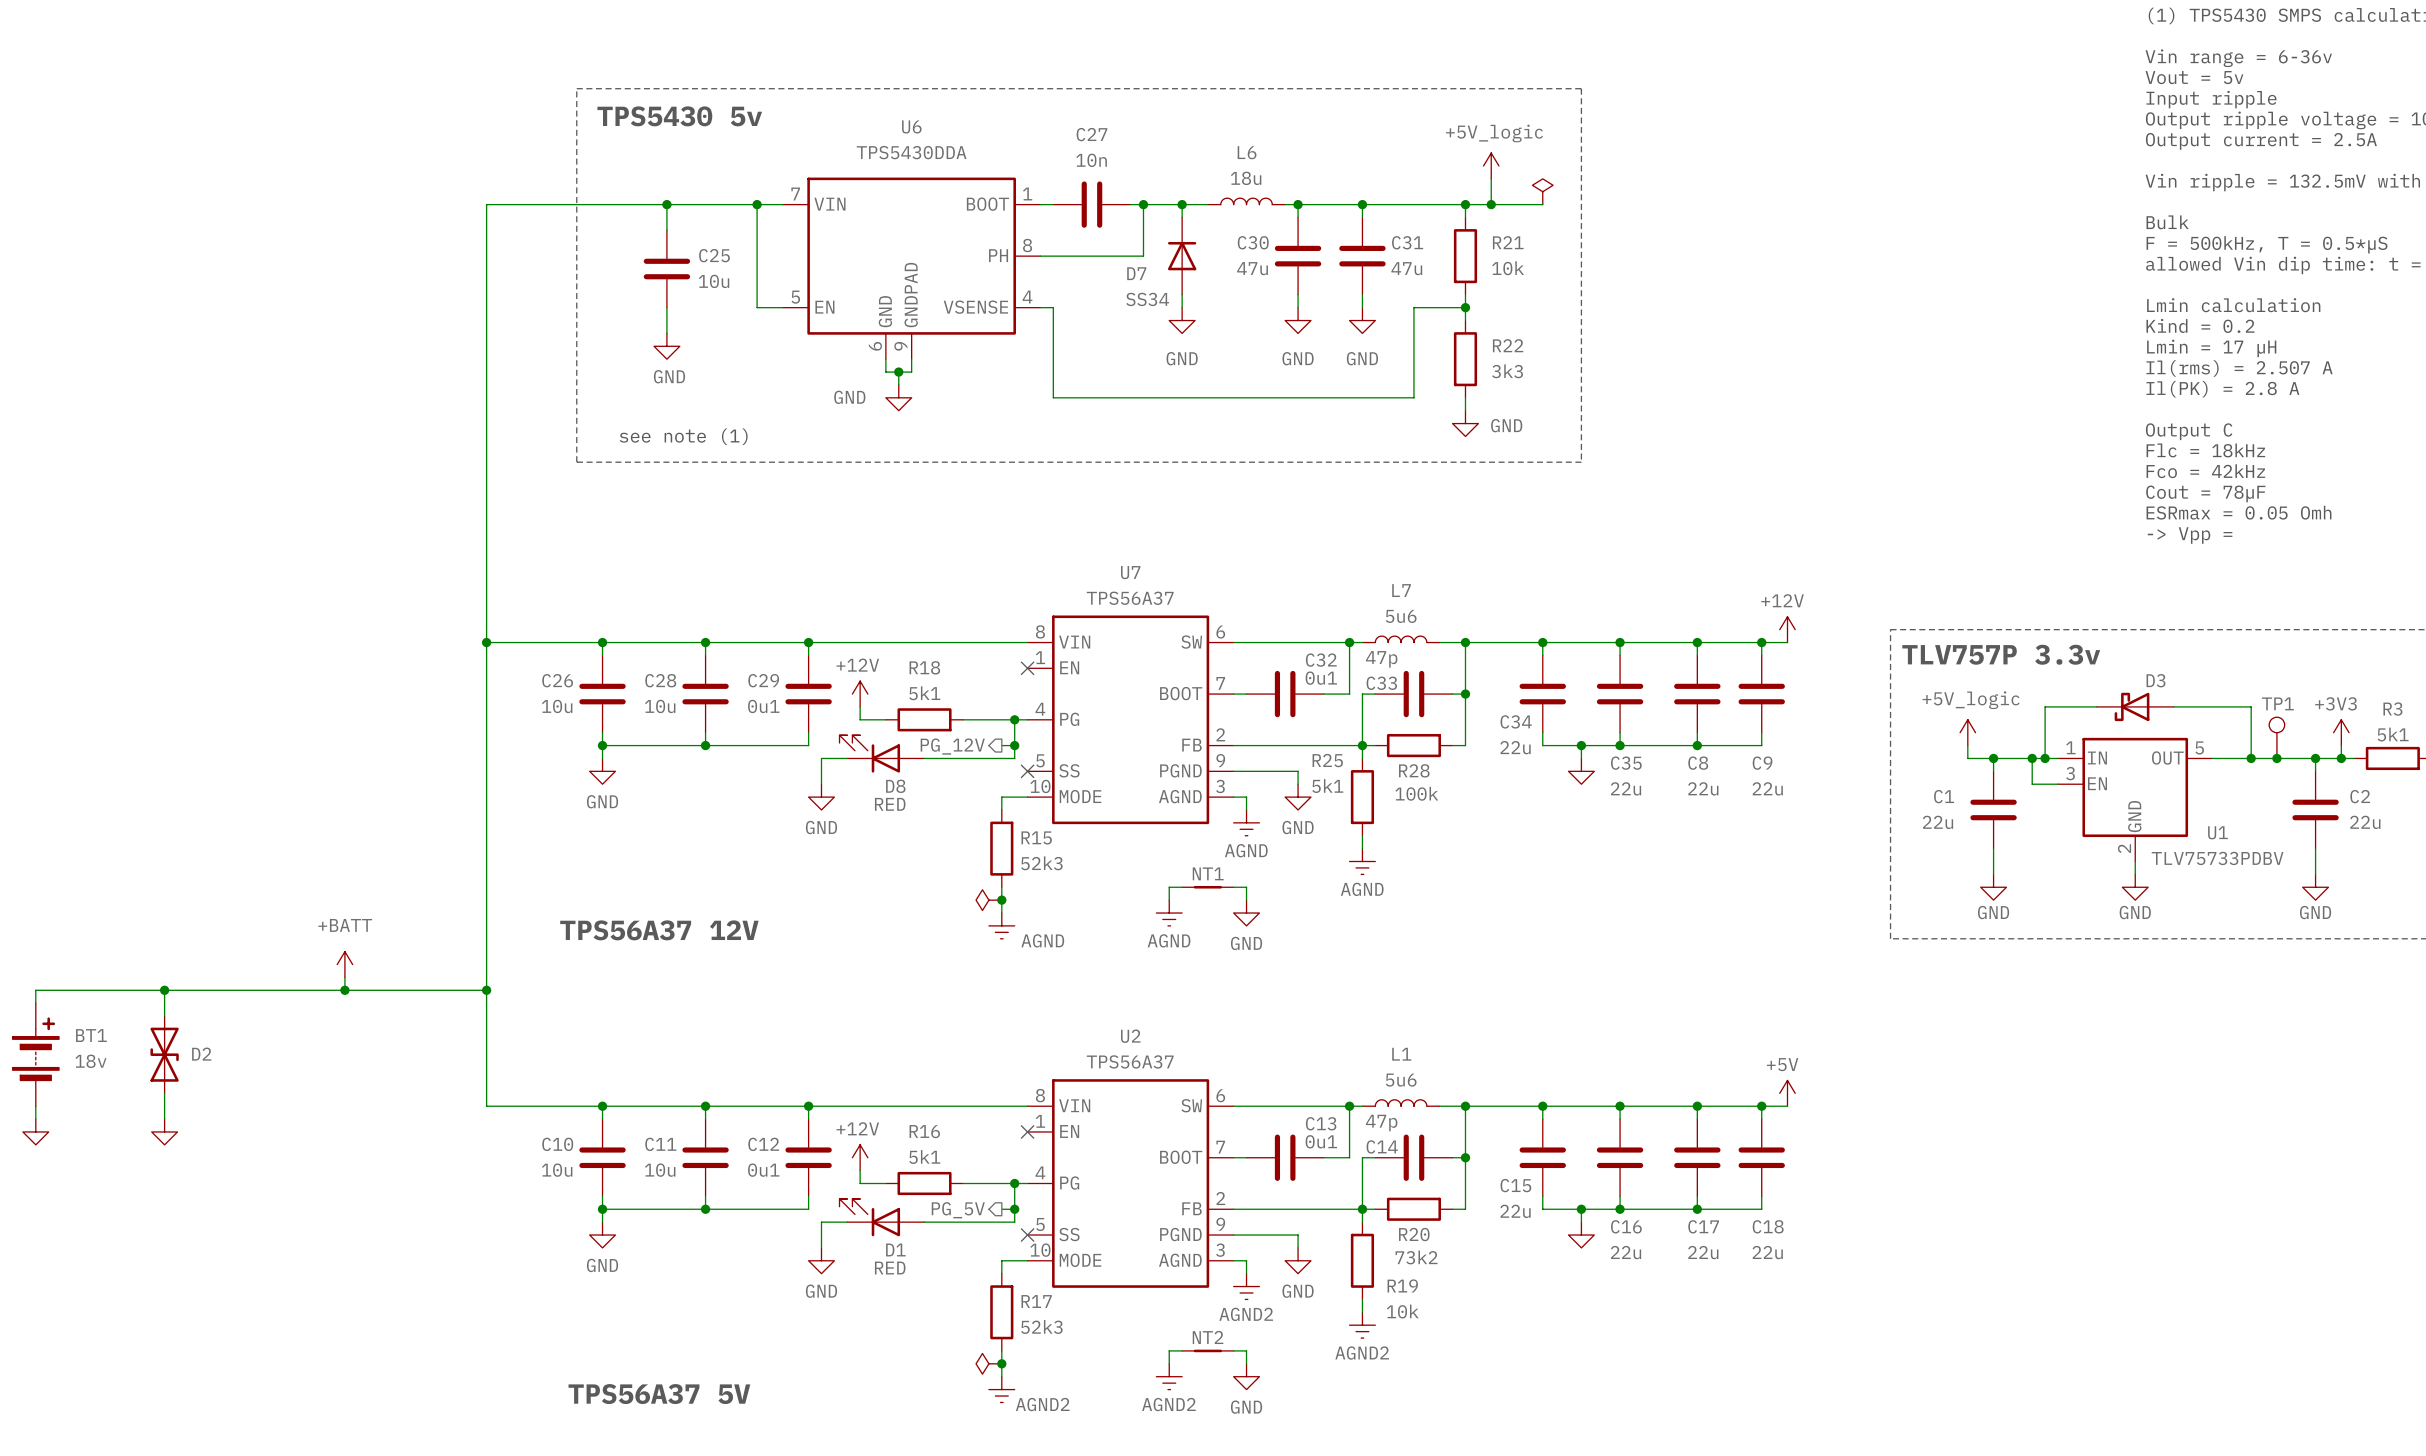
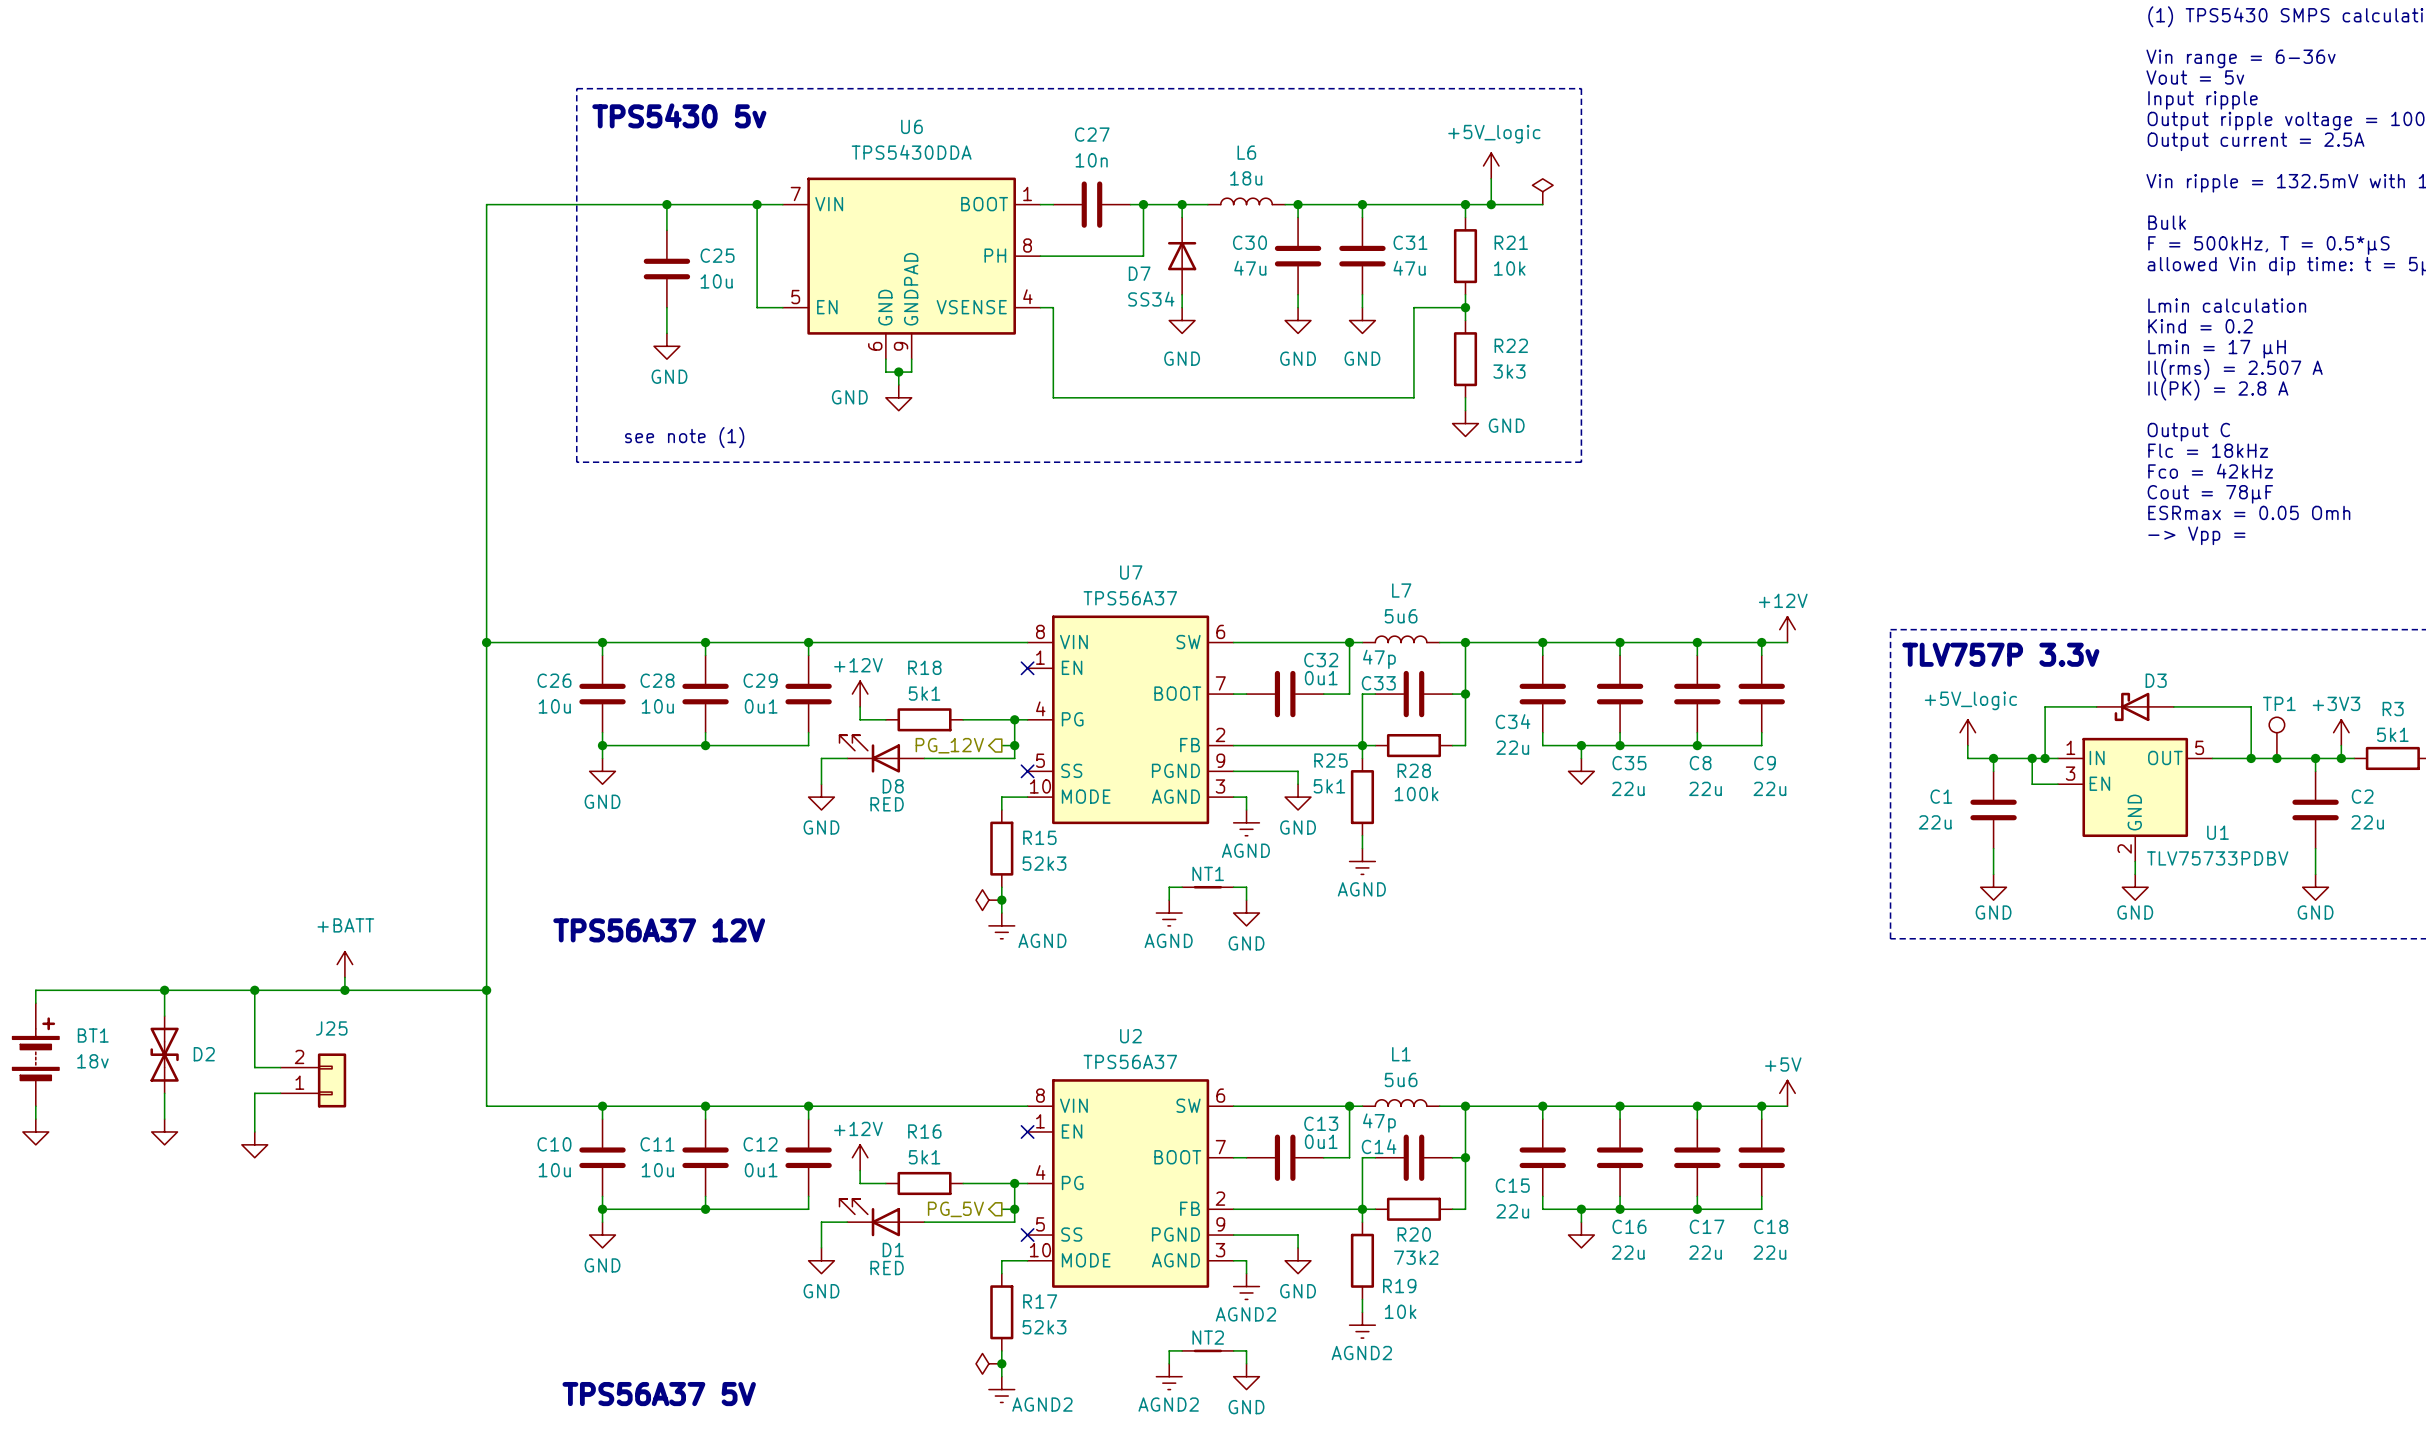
wire: none -> (254, 990) (254, 1067) (280, 1067)
junction: none -> (254, 990)
J25: none -> (313, 1080)
wire: none -> (280, 1093) (254, 1093) (254, 1131)
power symbol: none -> (254, 1144)

